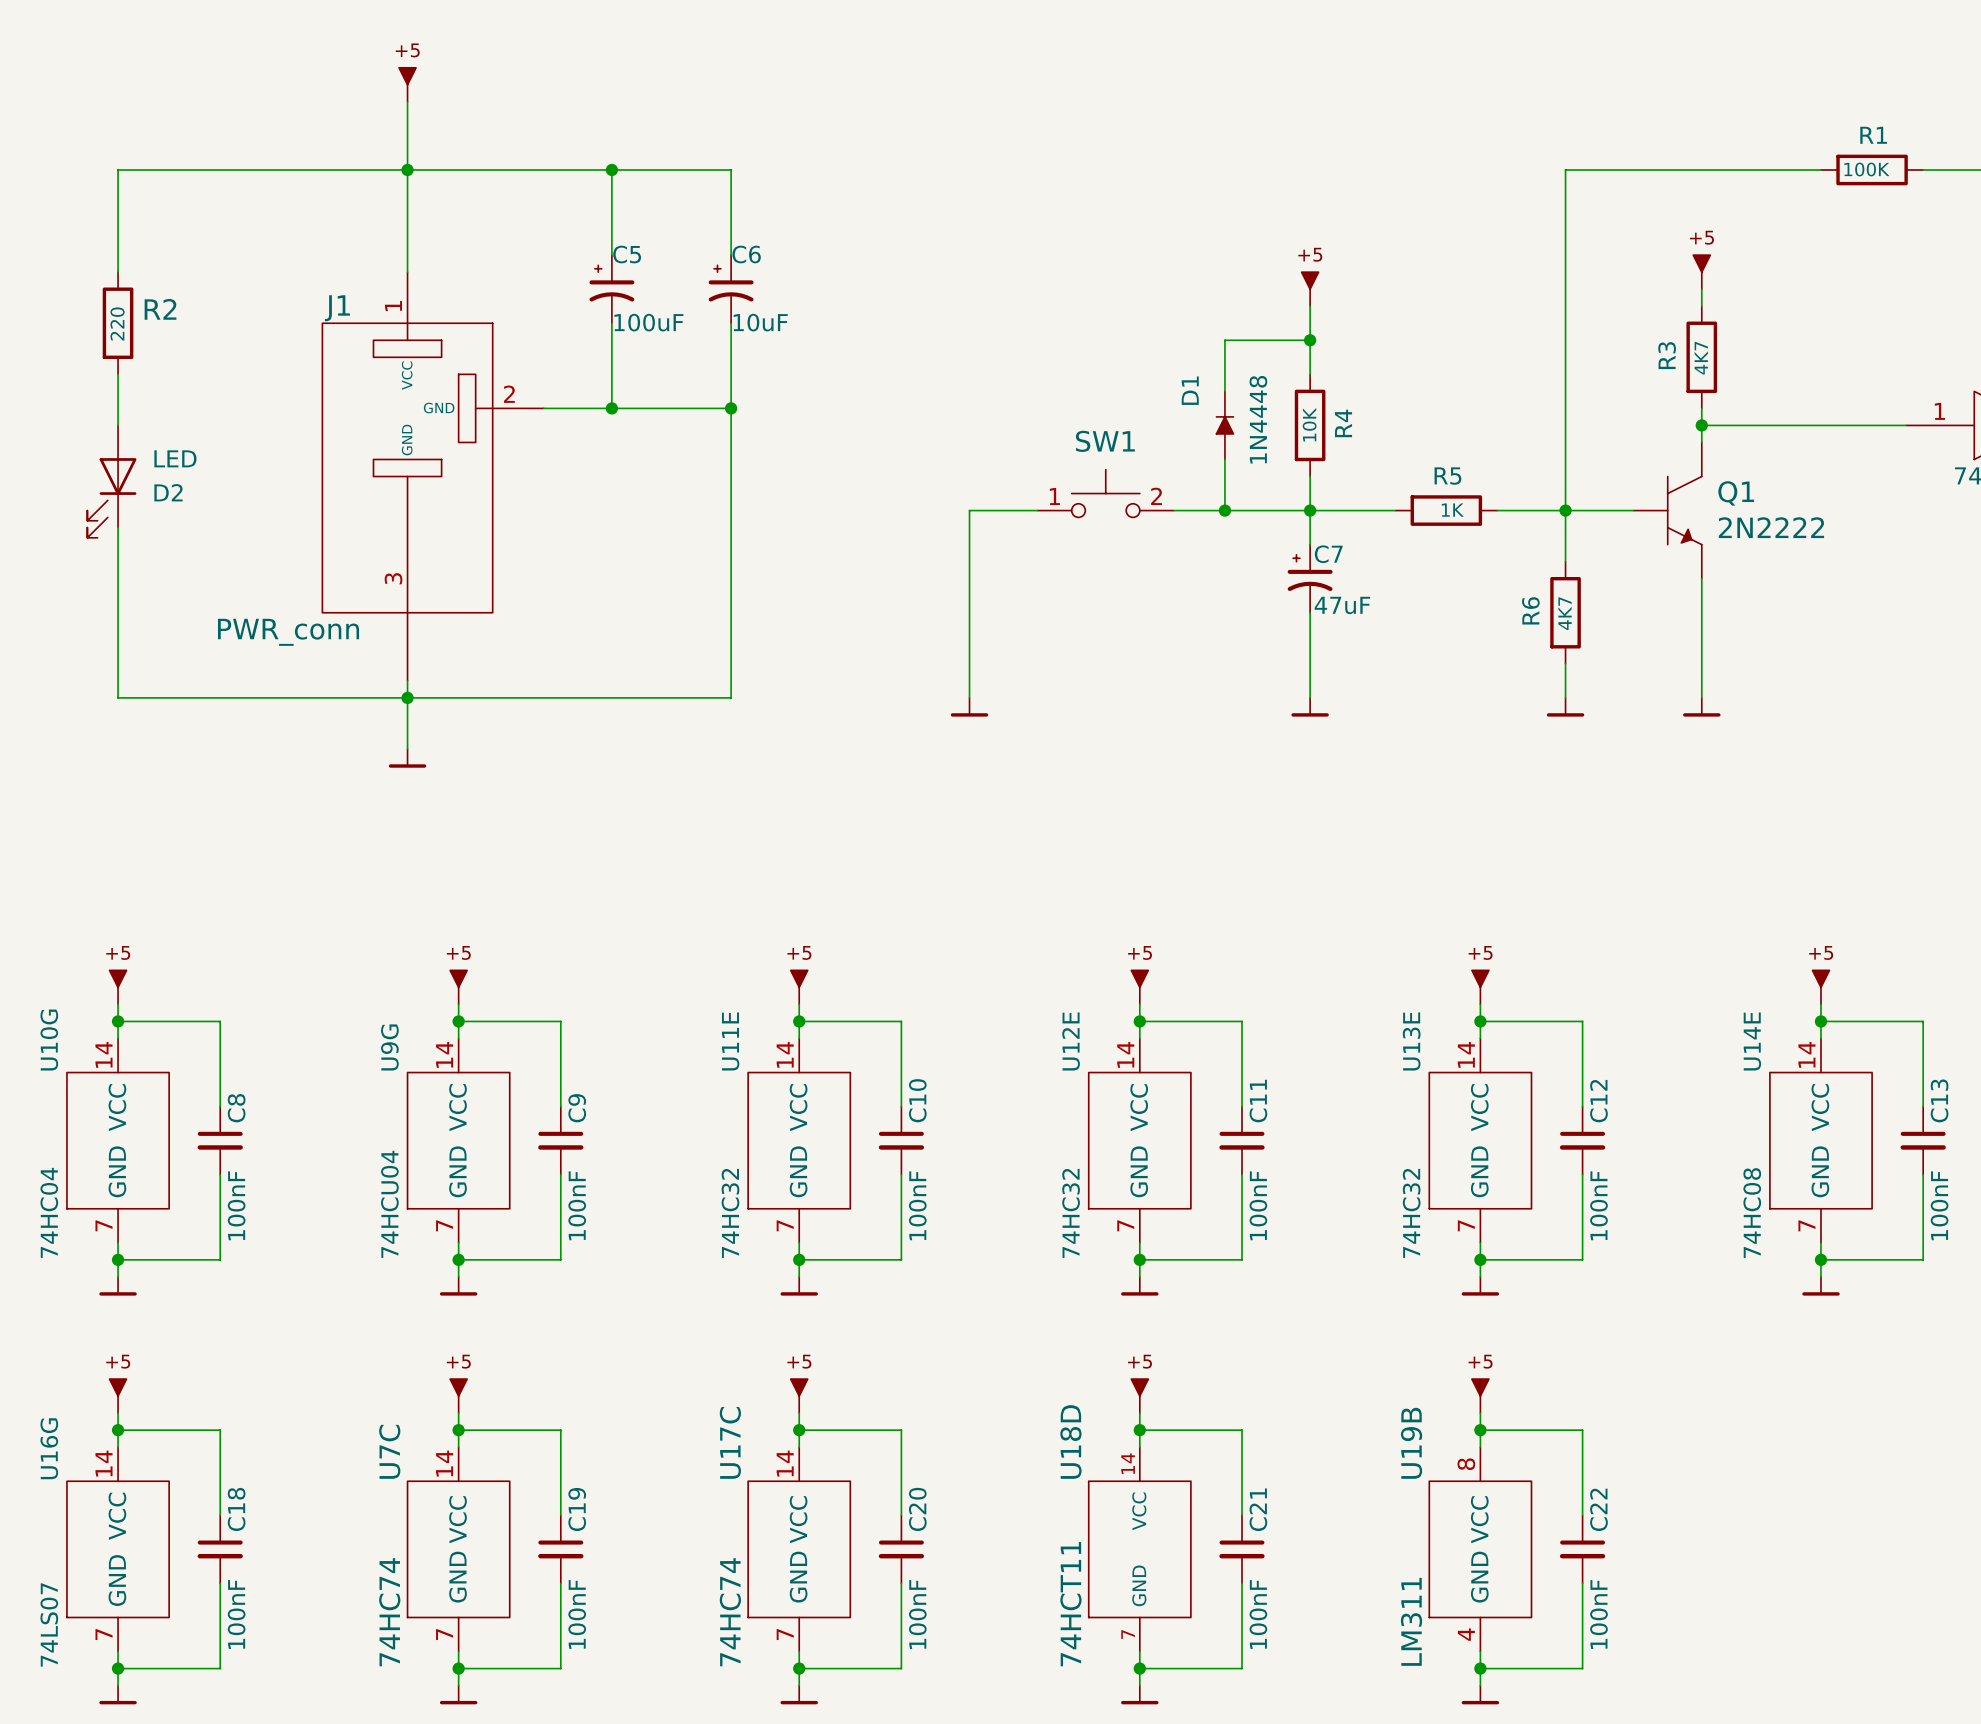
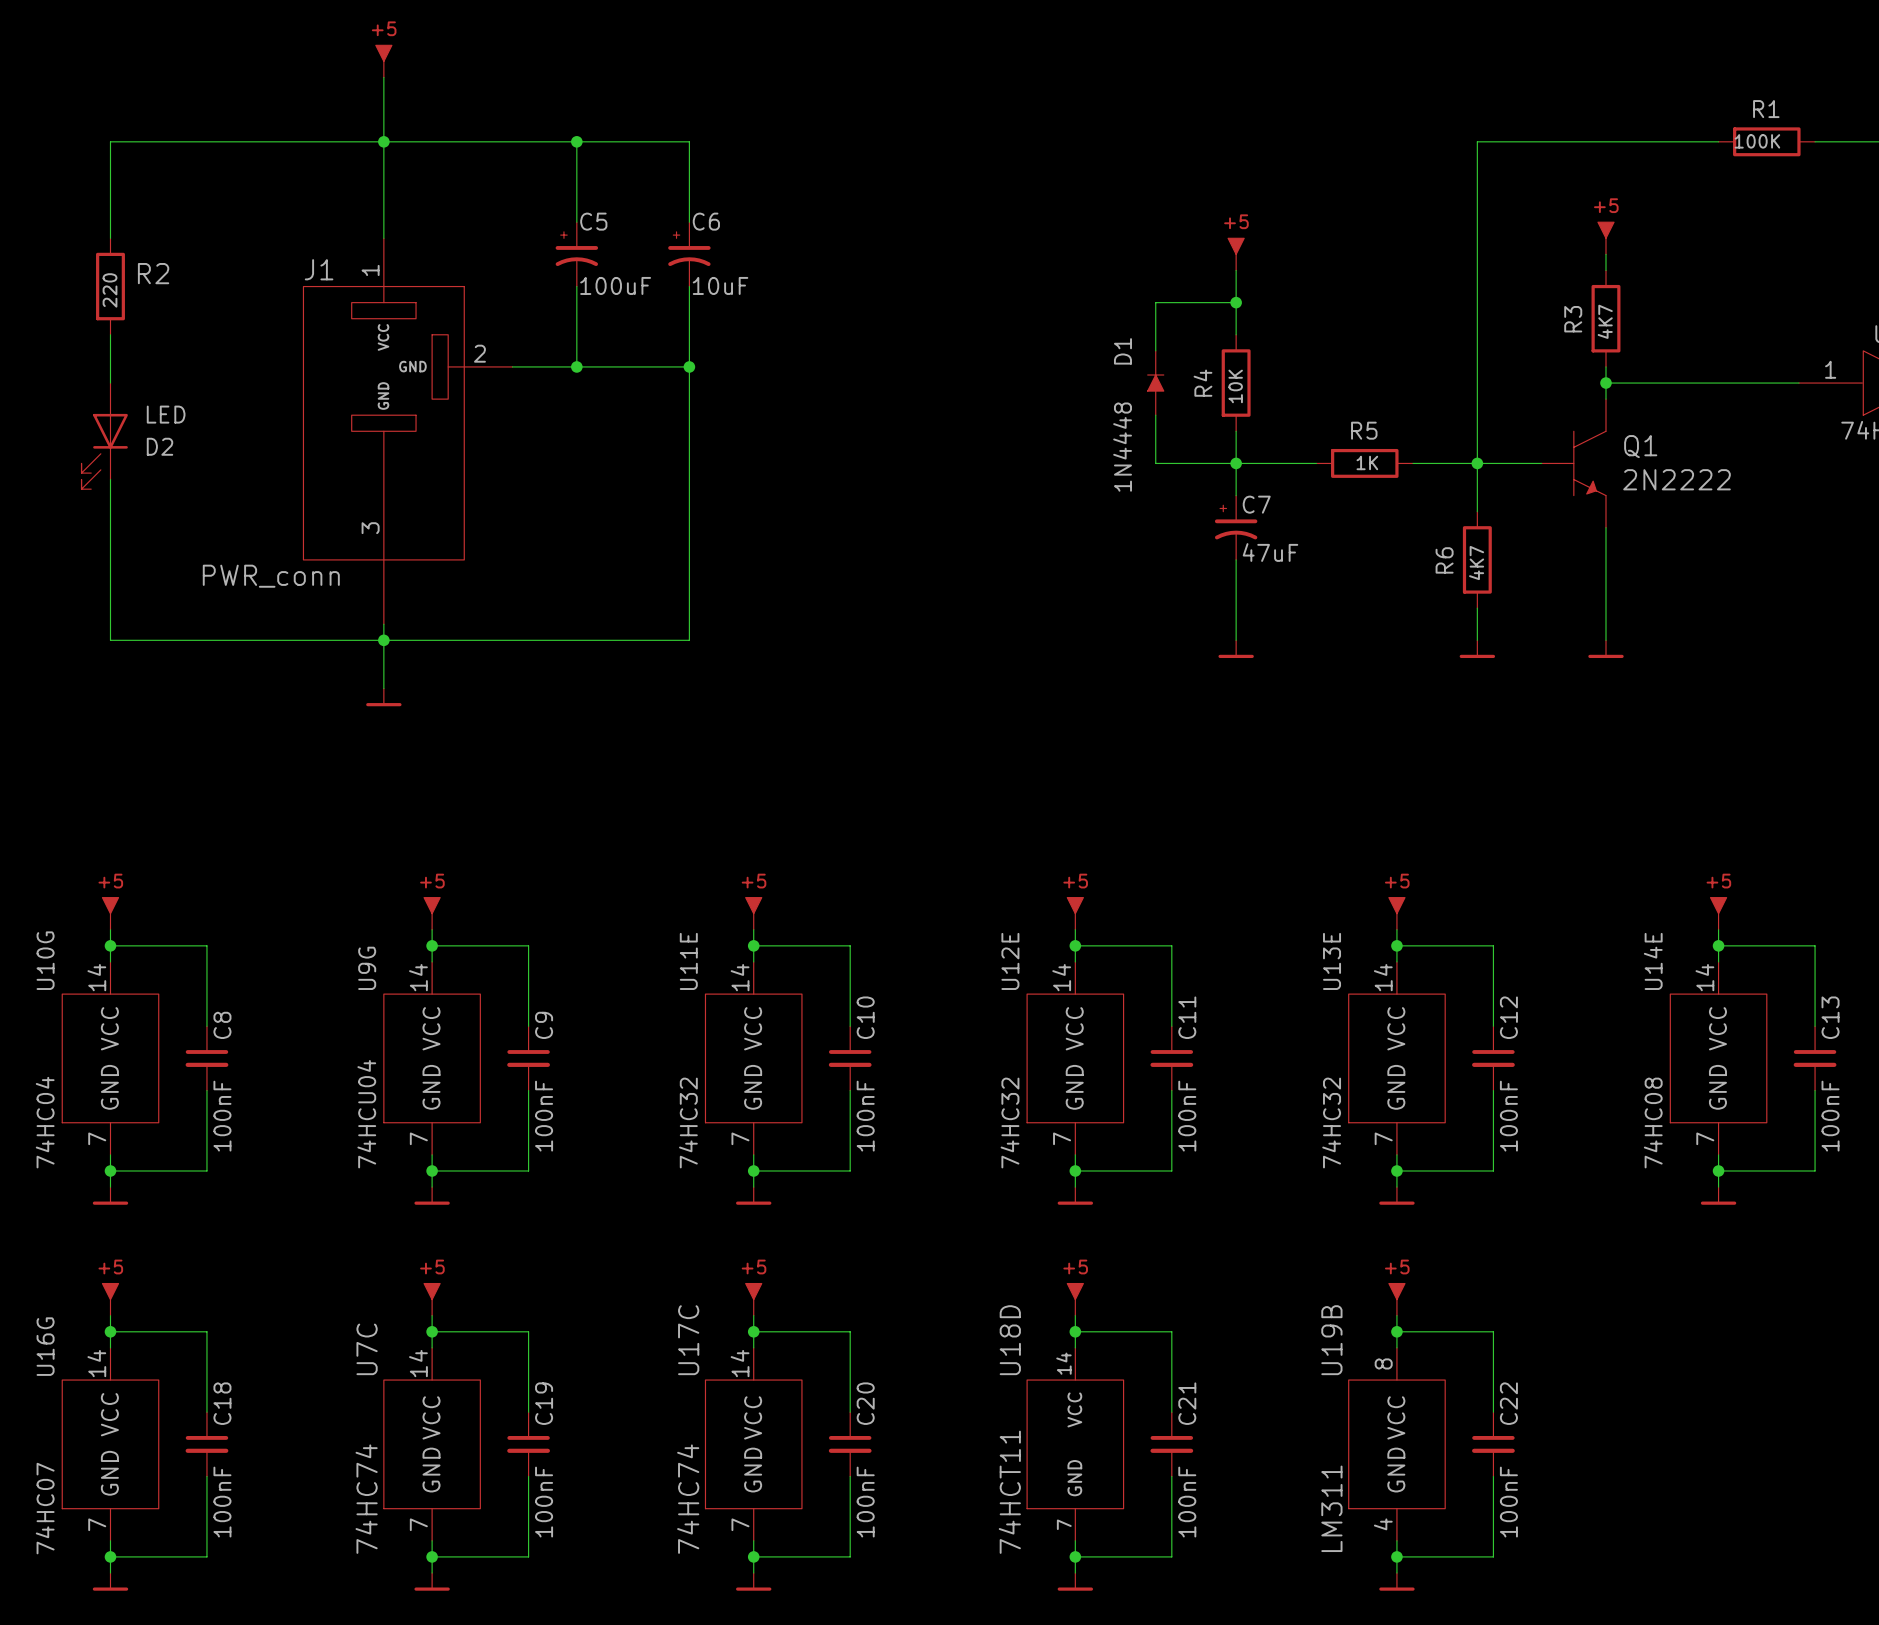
D1 value position: 1N4448 (1258, 419) -> 1N4448 (1122, 447)
R4 name position: R4 (1343, 423) -> R4 (1202, 383)
SW1: (1105, 493) -> none
wire: (1037, 510) (969, 510) (969, 697) -> none
wire: (1173, 510) (1224, 510) -> none
junction: (1224, 510) -> none
power symbol: (969, 707) -> none
U16G value: 74LS07 (49, 1624) -> 74HC07 (45, 1508)

